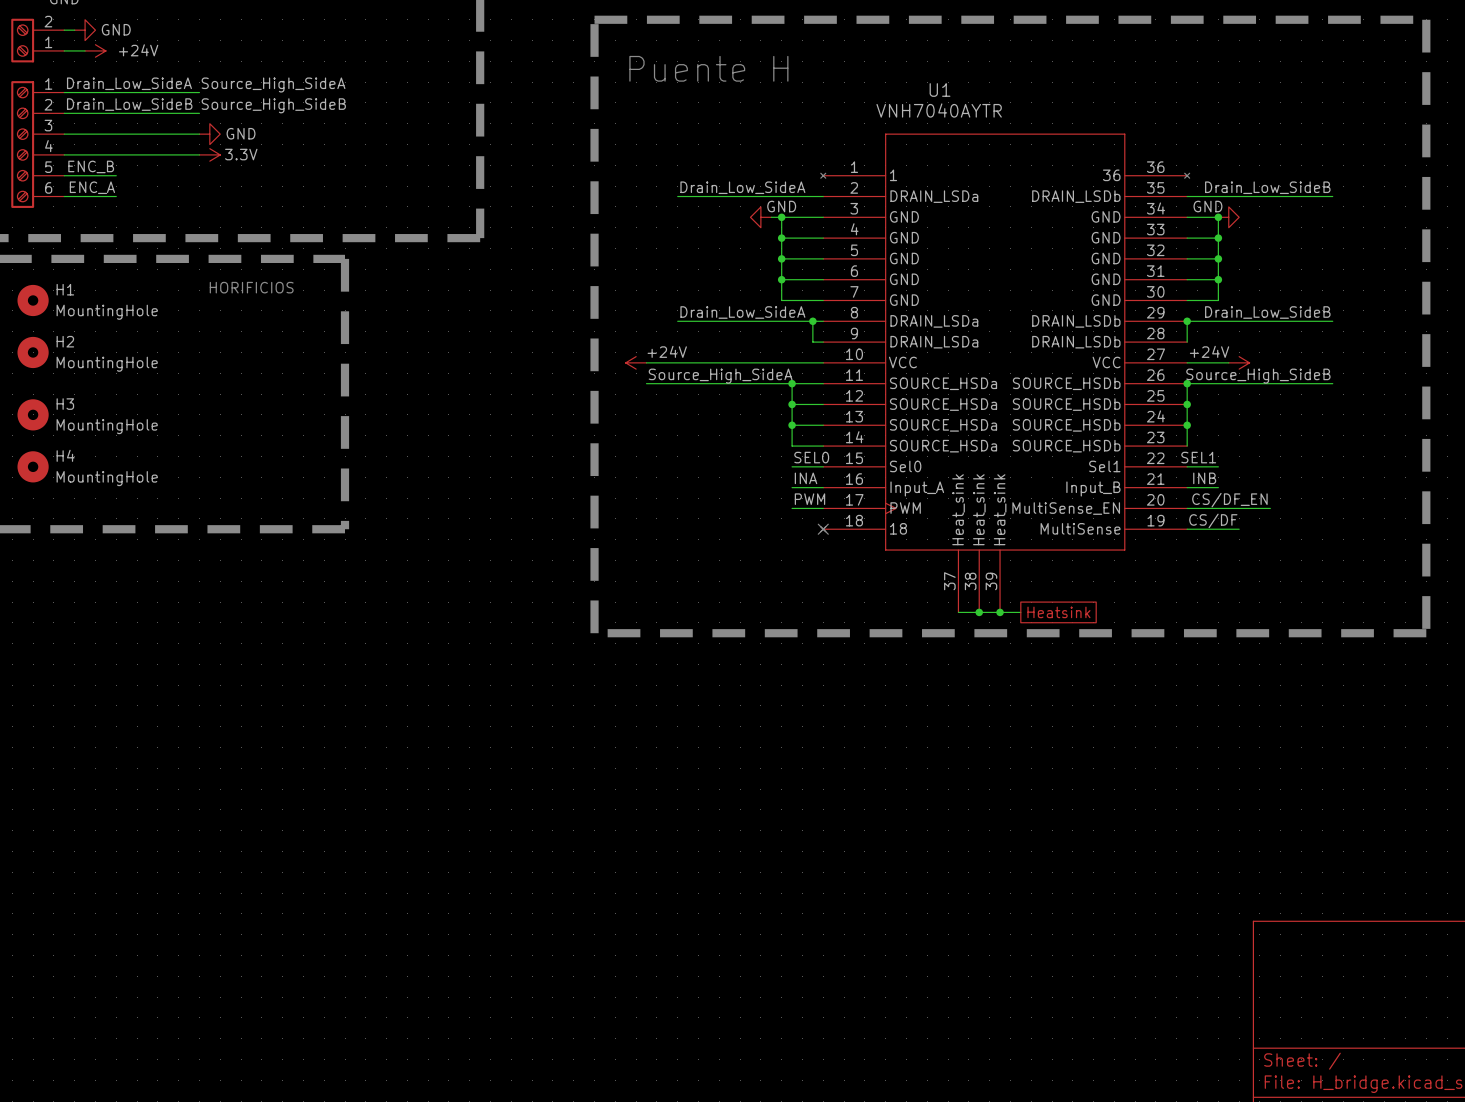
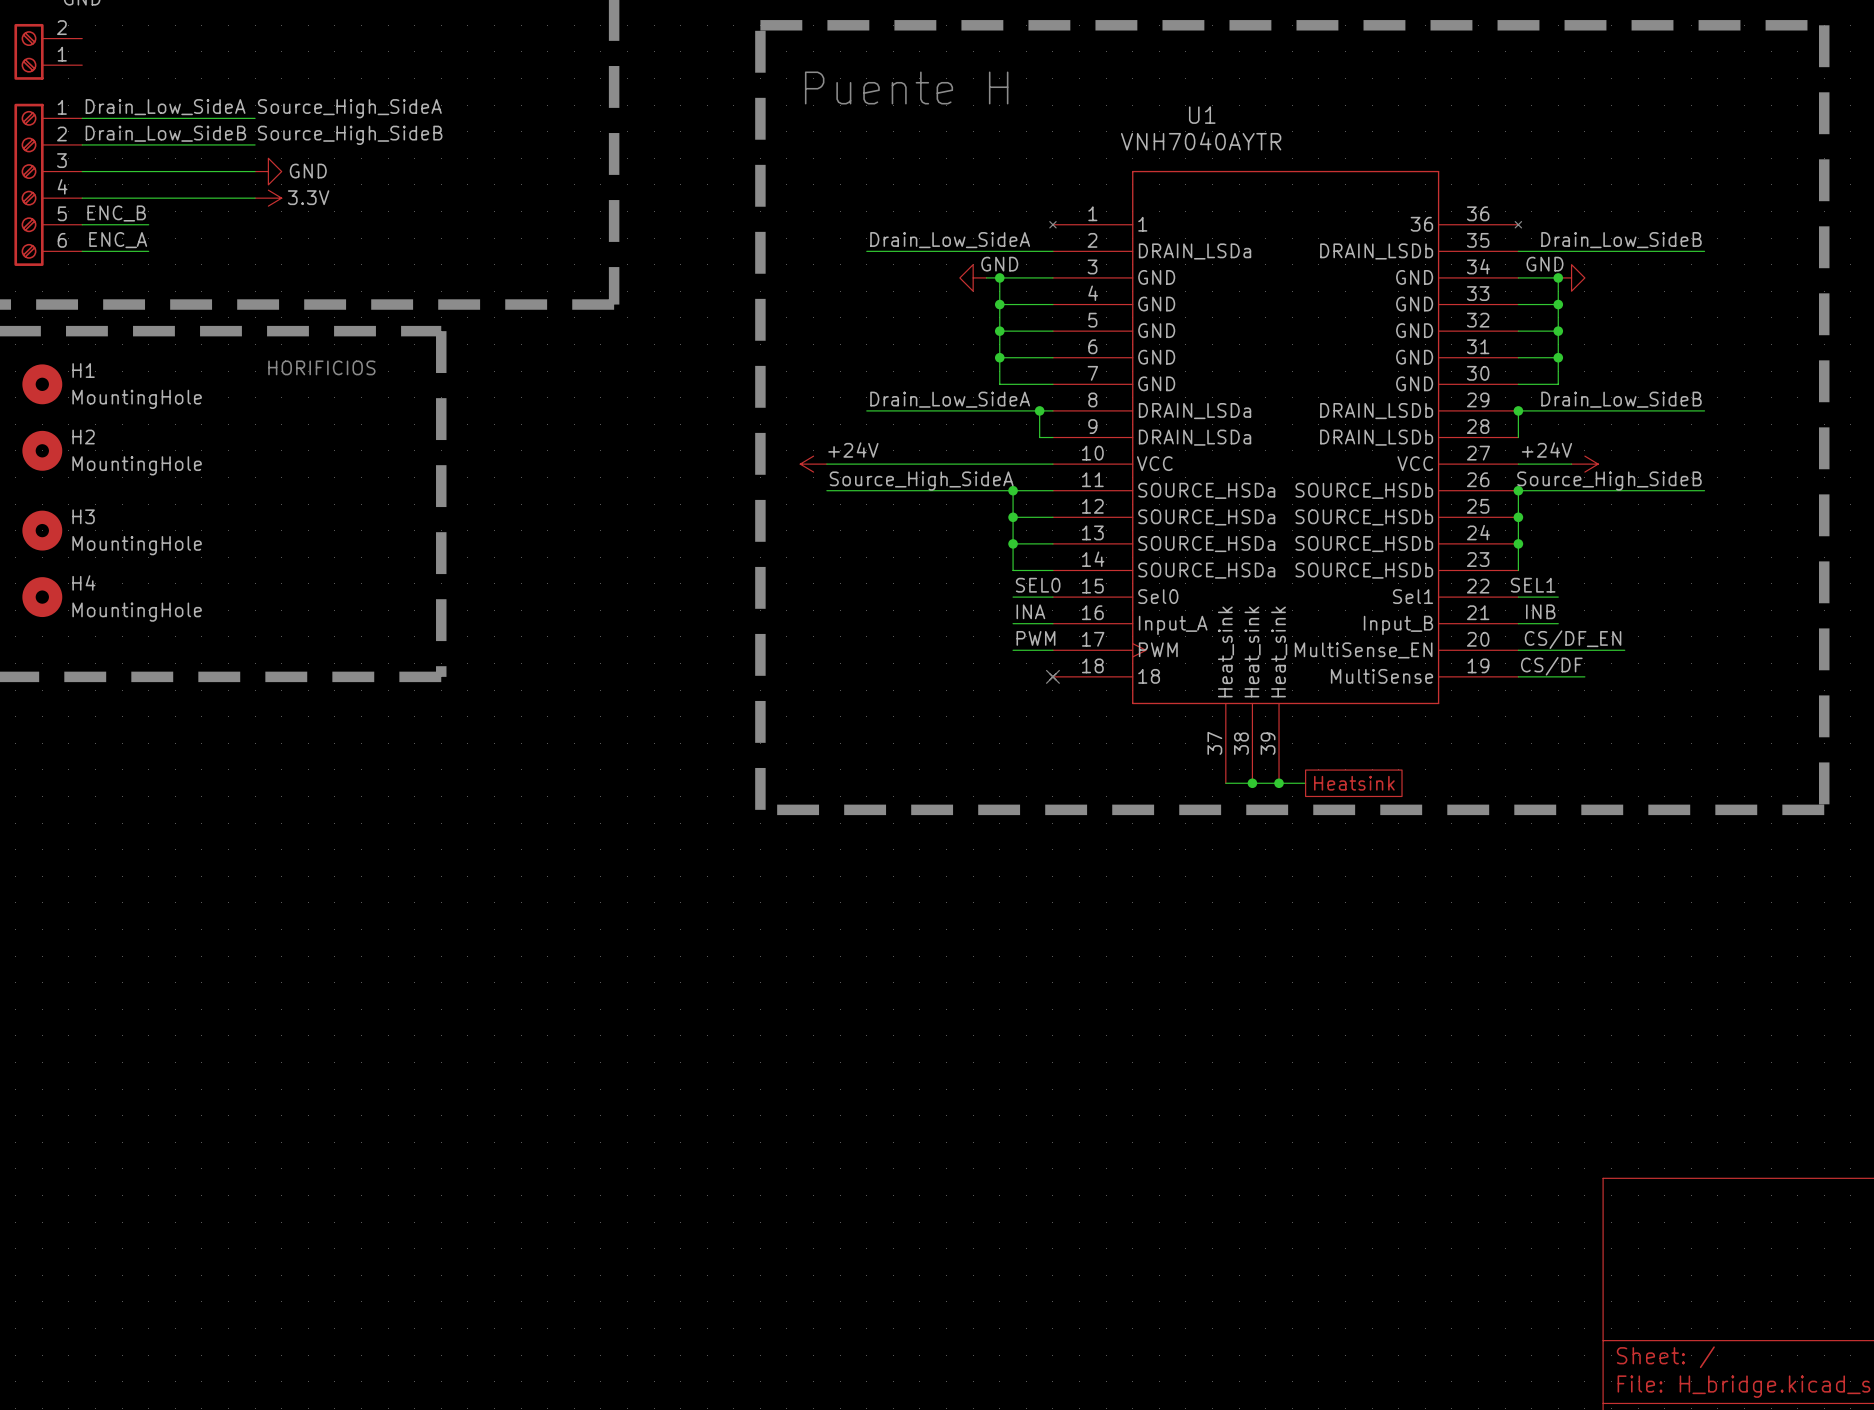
wire: (64, 30) (74, 30) -> none
power symbol: GND (85, 30) -> none
wire: (64, 50) (85, 50) -> none
power symbol: +24V (95, 50) -> none

